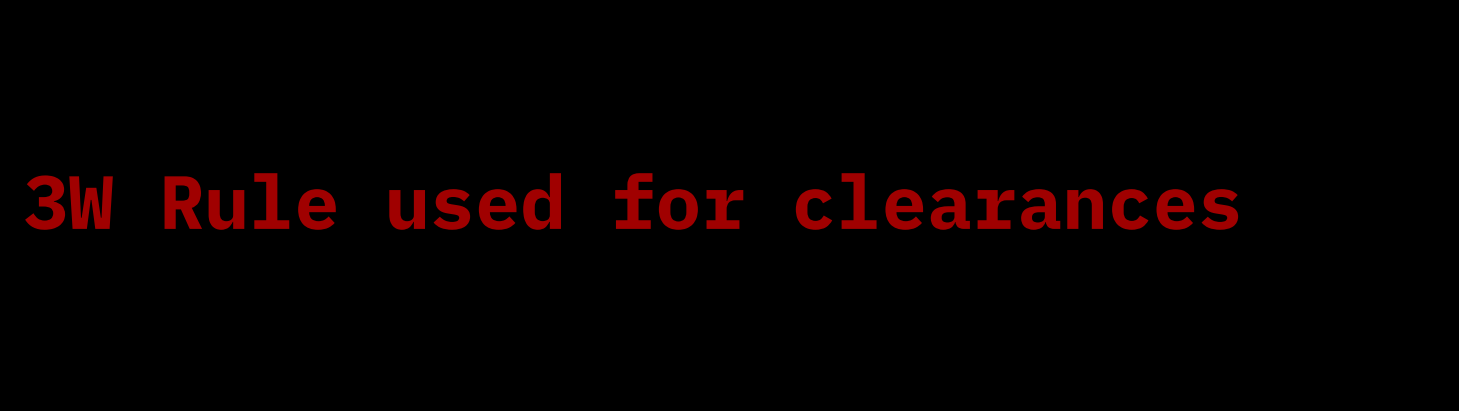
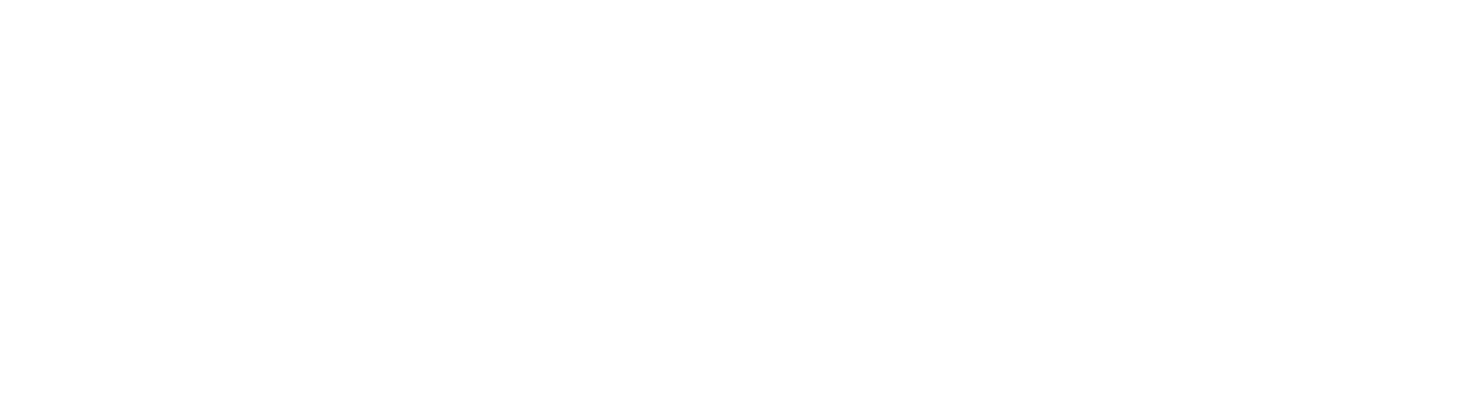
text: 3W Rule used for clearances (631, 201) -> none

